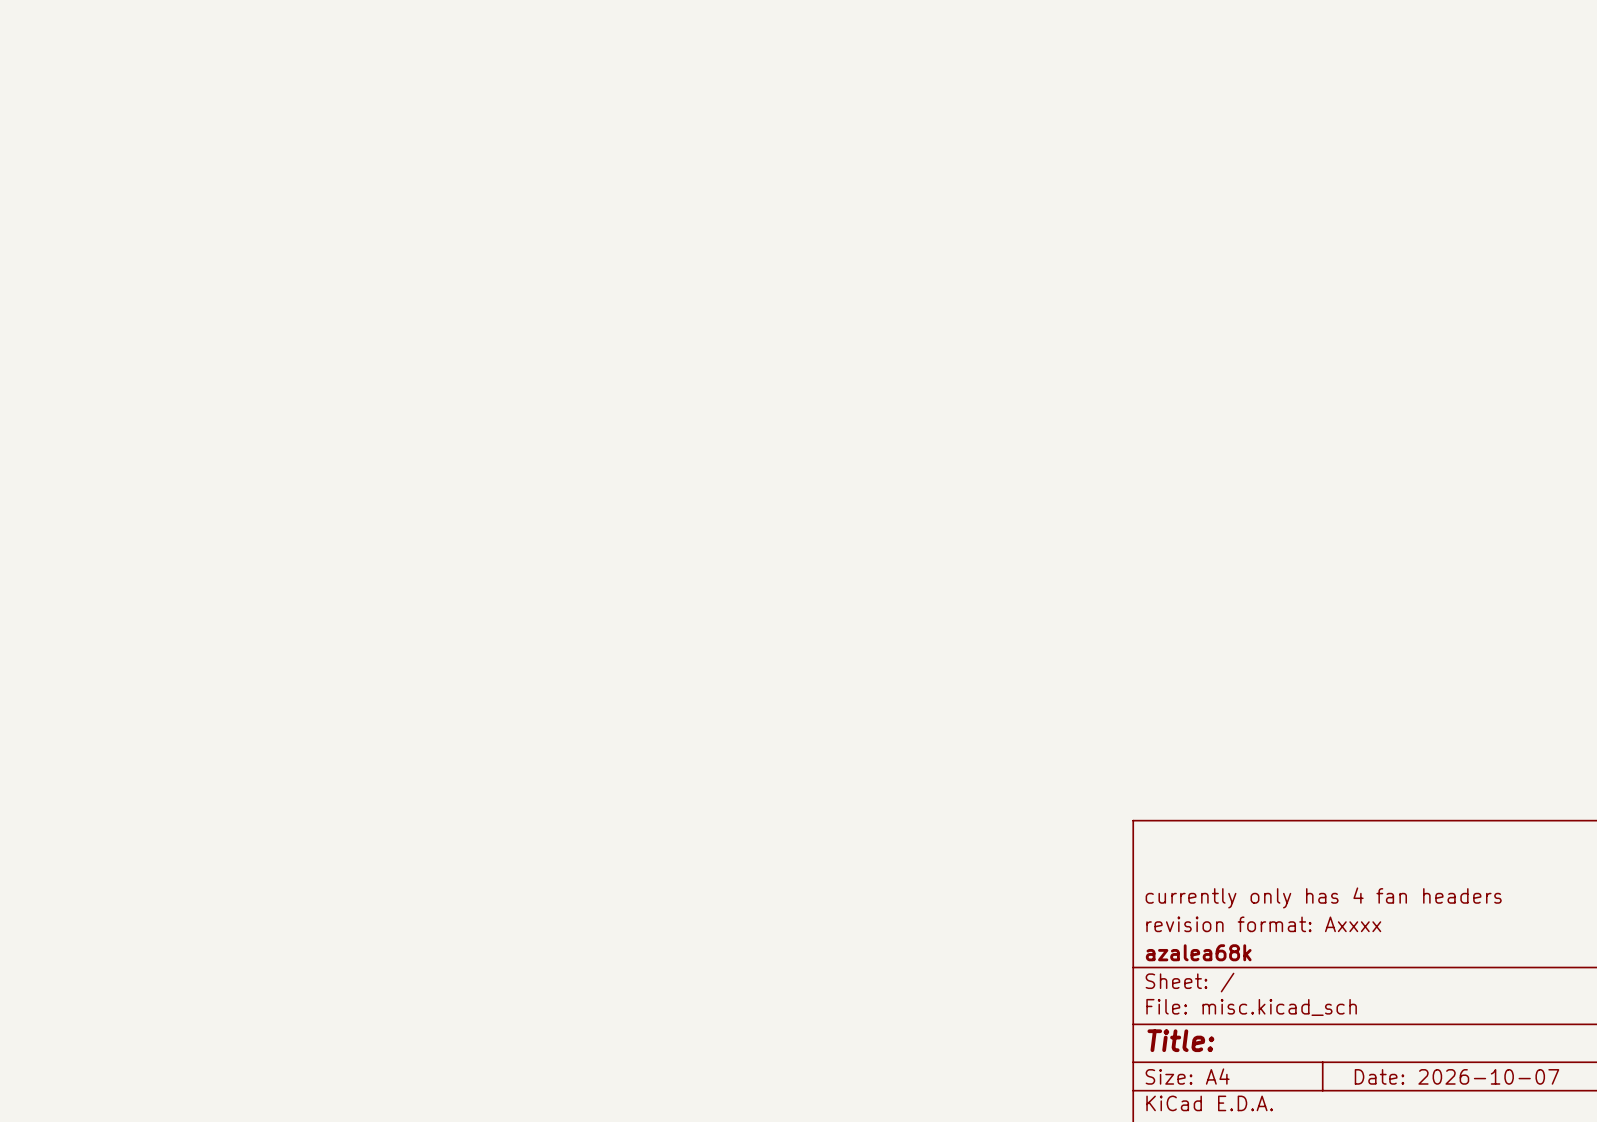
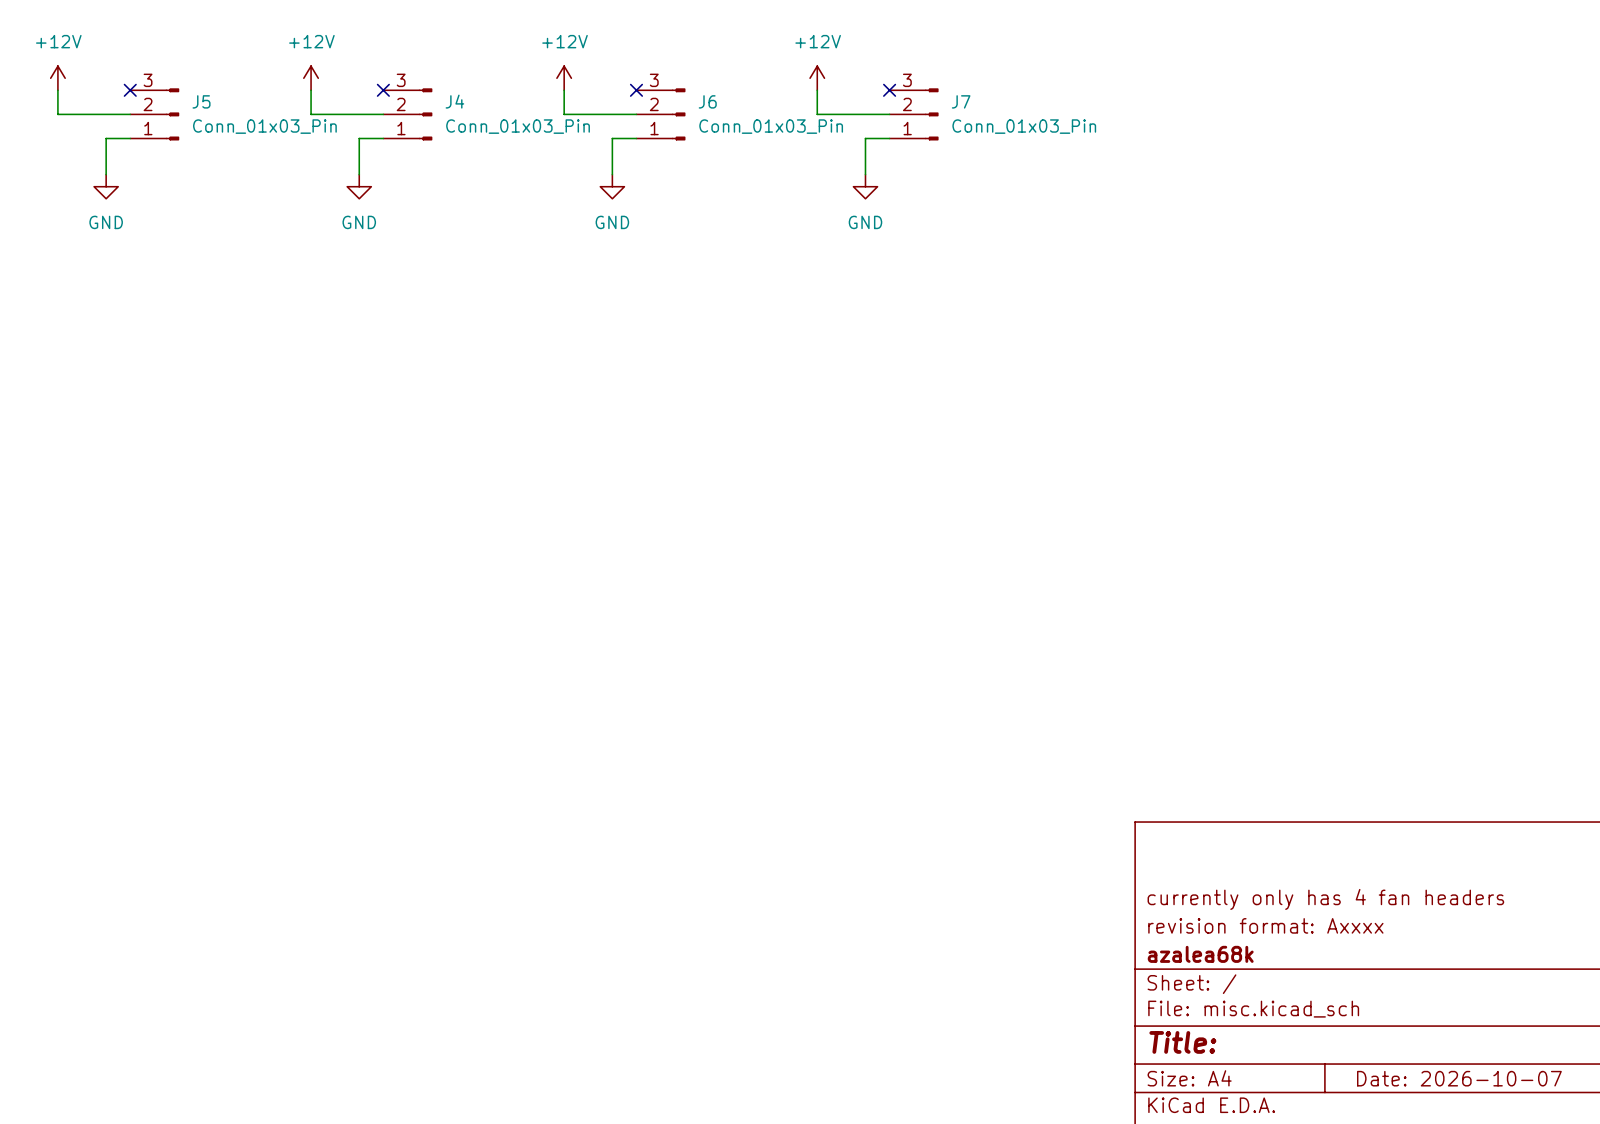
power symbol: none -> +12V (57, 78)
power symbol: none -> +12V (311, 78)
power symbol: none -> +12V (564, 78)
power symbol: none -> +12V (817, 78)
wire: none -> (57, 90) (57, 114) (130, 114)
no-connect mark: none -> (130, 90)
wire: none -> (311, 90) (311, 114) (383, 114)
no-connect mark: none -> (383, 90)
wire: none -> (564, 90) (564, 114) (636, 114)
no-connect mark: none -> (636, 90)
wire: none -> (817, 90) (817, 114) (889, 114)
no-connect mark: none -> (889, 90)
J5: none -> Conn_01x03_Pin (154, 114)
J4: none -> Conn_01x03_Pin (407, 114)
J6: none -> Conn_01x03_Pin (660, 114)
J7: none -> Conn_01x03_Pin (914, 114)
wire: none -> (130, 138) (106, 138) (106, 174)
wire: none -> (383, 138) (359, 138) (359, 174)
wire: none -> (636, 138) (612, 138) (612, 174)
wire: none -> (889, 138) (865, 138) (865, 174)
power symbol: none -> GND (106, 186)
power symbol: none -> GND (359, 186)
power symbol: none -> GND (612, 186)
power symbol: none -> GND (865, 186)

